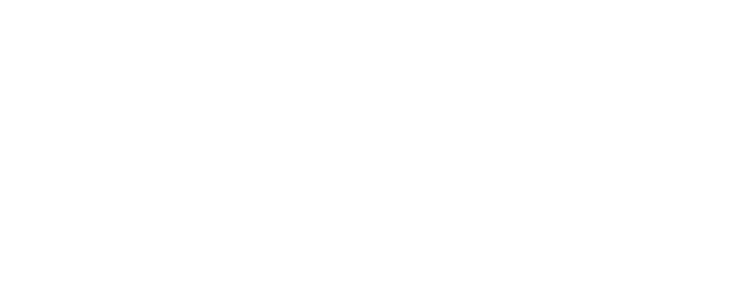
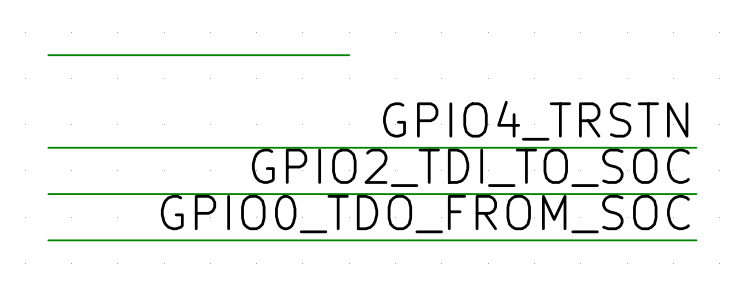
wire: none -> (48, 55) (349, 55)
label: none -> GPIO4_TRSTN (535, 120)
wire: none -> (48, 147) (696, 147)
label: none -> GPIO2_TDI_TO_SOC (470, 167)
wire: none -> (48, 194) (696, 194)
label: none -> GPIO0_TDO_FROM_SOC (425, 214)
wire: none -> (48, 240) (696, 240)

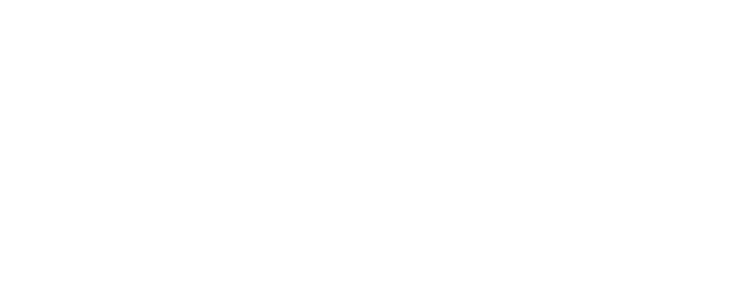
wire: (48, 55) (349, 55) -> none
label: GPIO4_TRSTN (535, 120) -> none
wire: (48, 147) (696, 147) -> none
label: GPIO2_TDI_TO_SOC (470, 167) -> none
wire: (48, 194) (696, 194) -> none
label: GPIO0_TDO_FROM_SOC (425, 214) -> none
wire: (48, 240) (696, 240) -> none

